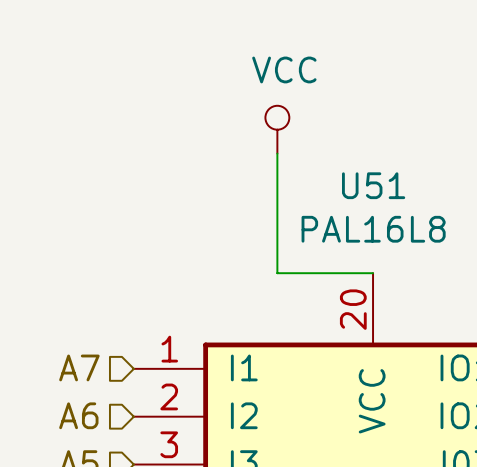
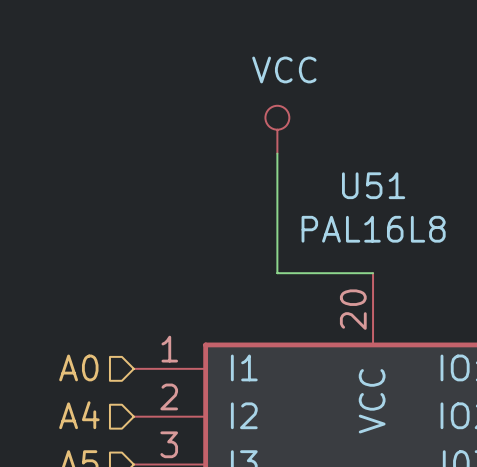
hierarchical label: A7 (79, 367) -> A0 (78, 367)
hierarchical label: A6 (78, 415) -> A4 (79, 415)

